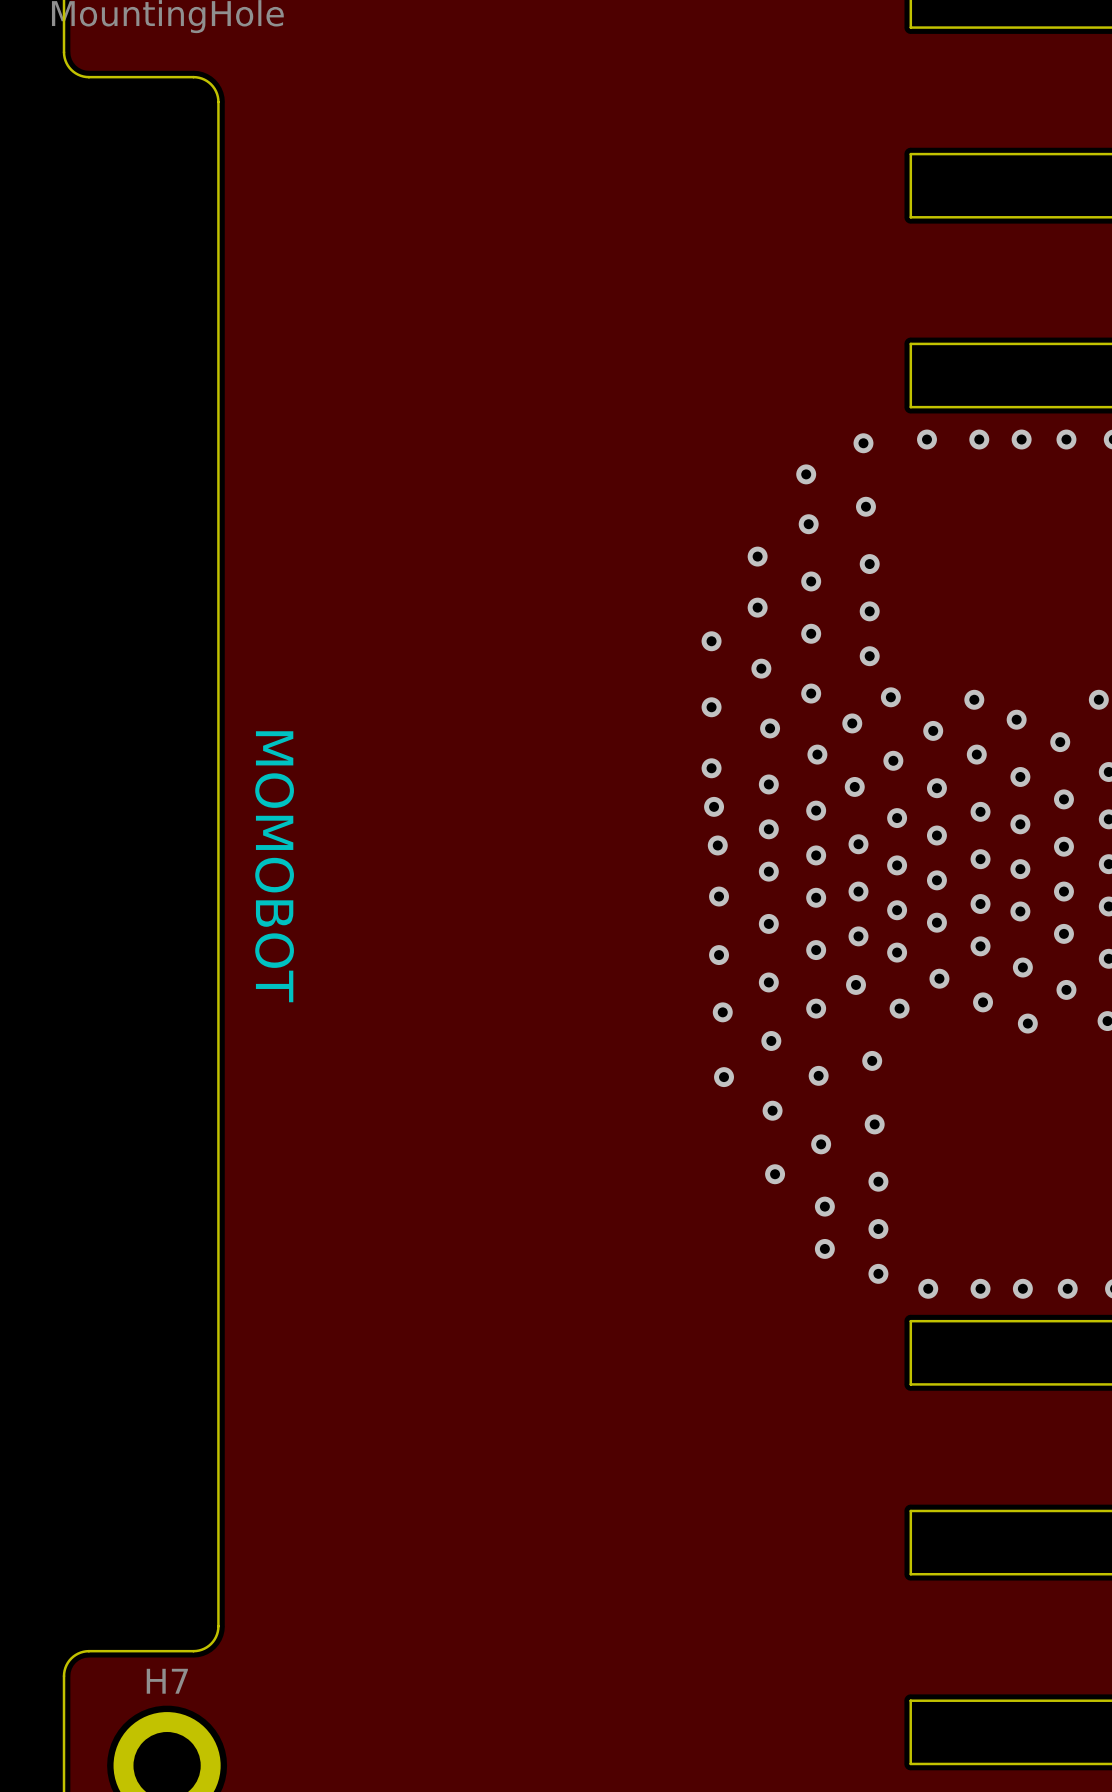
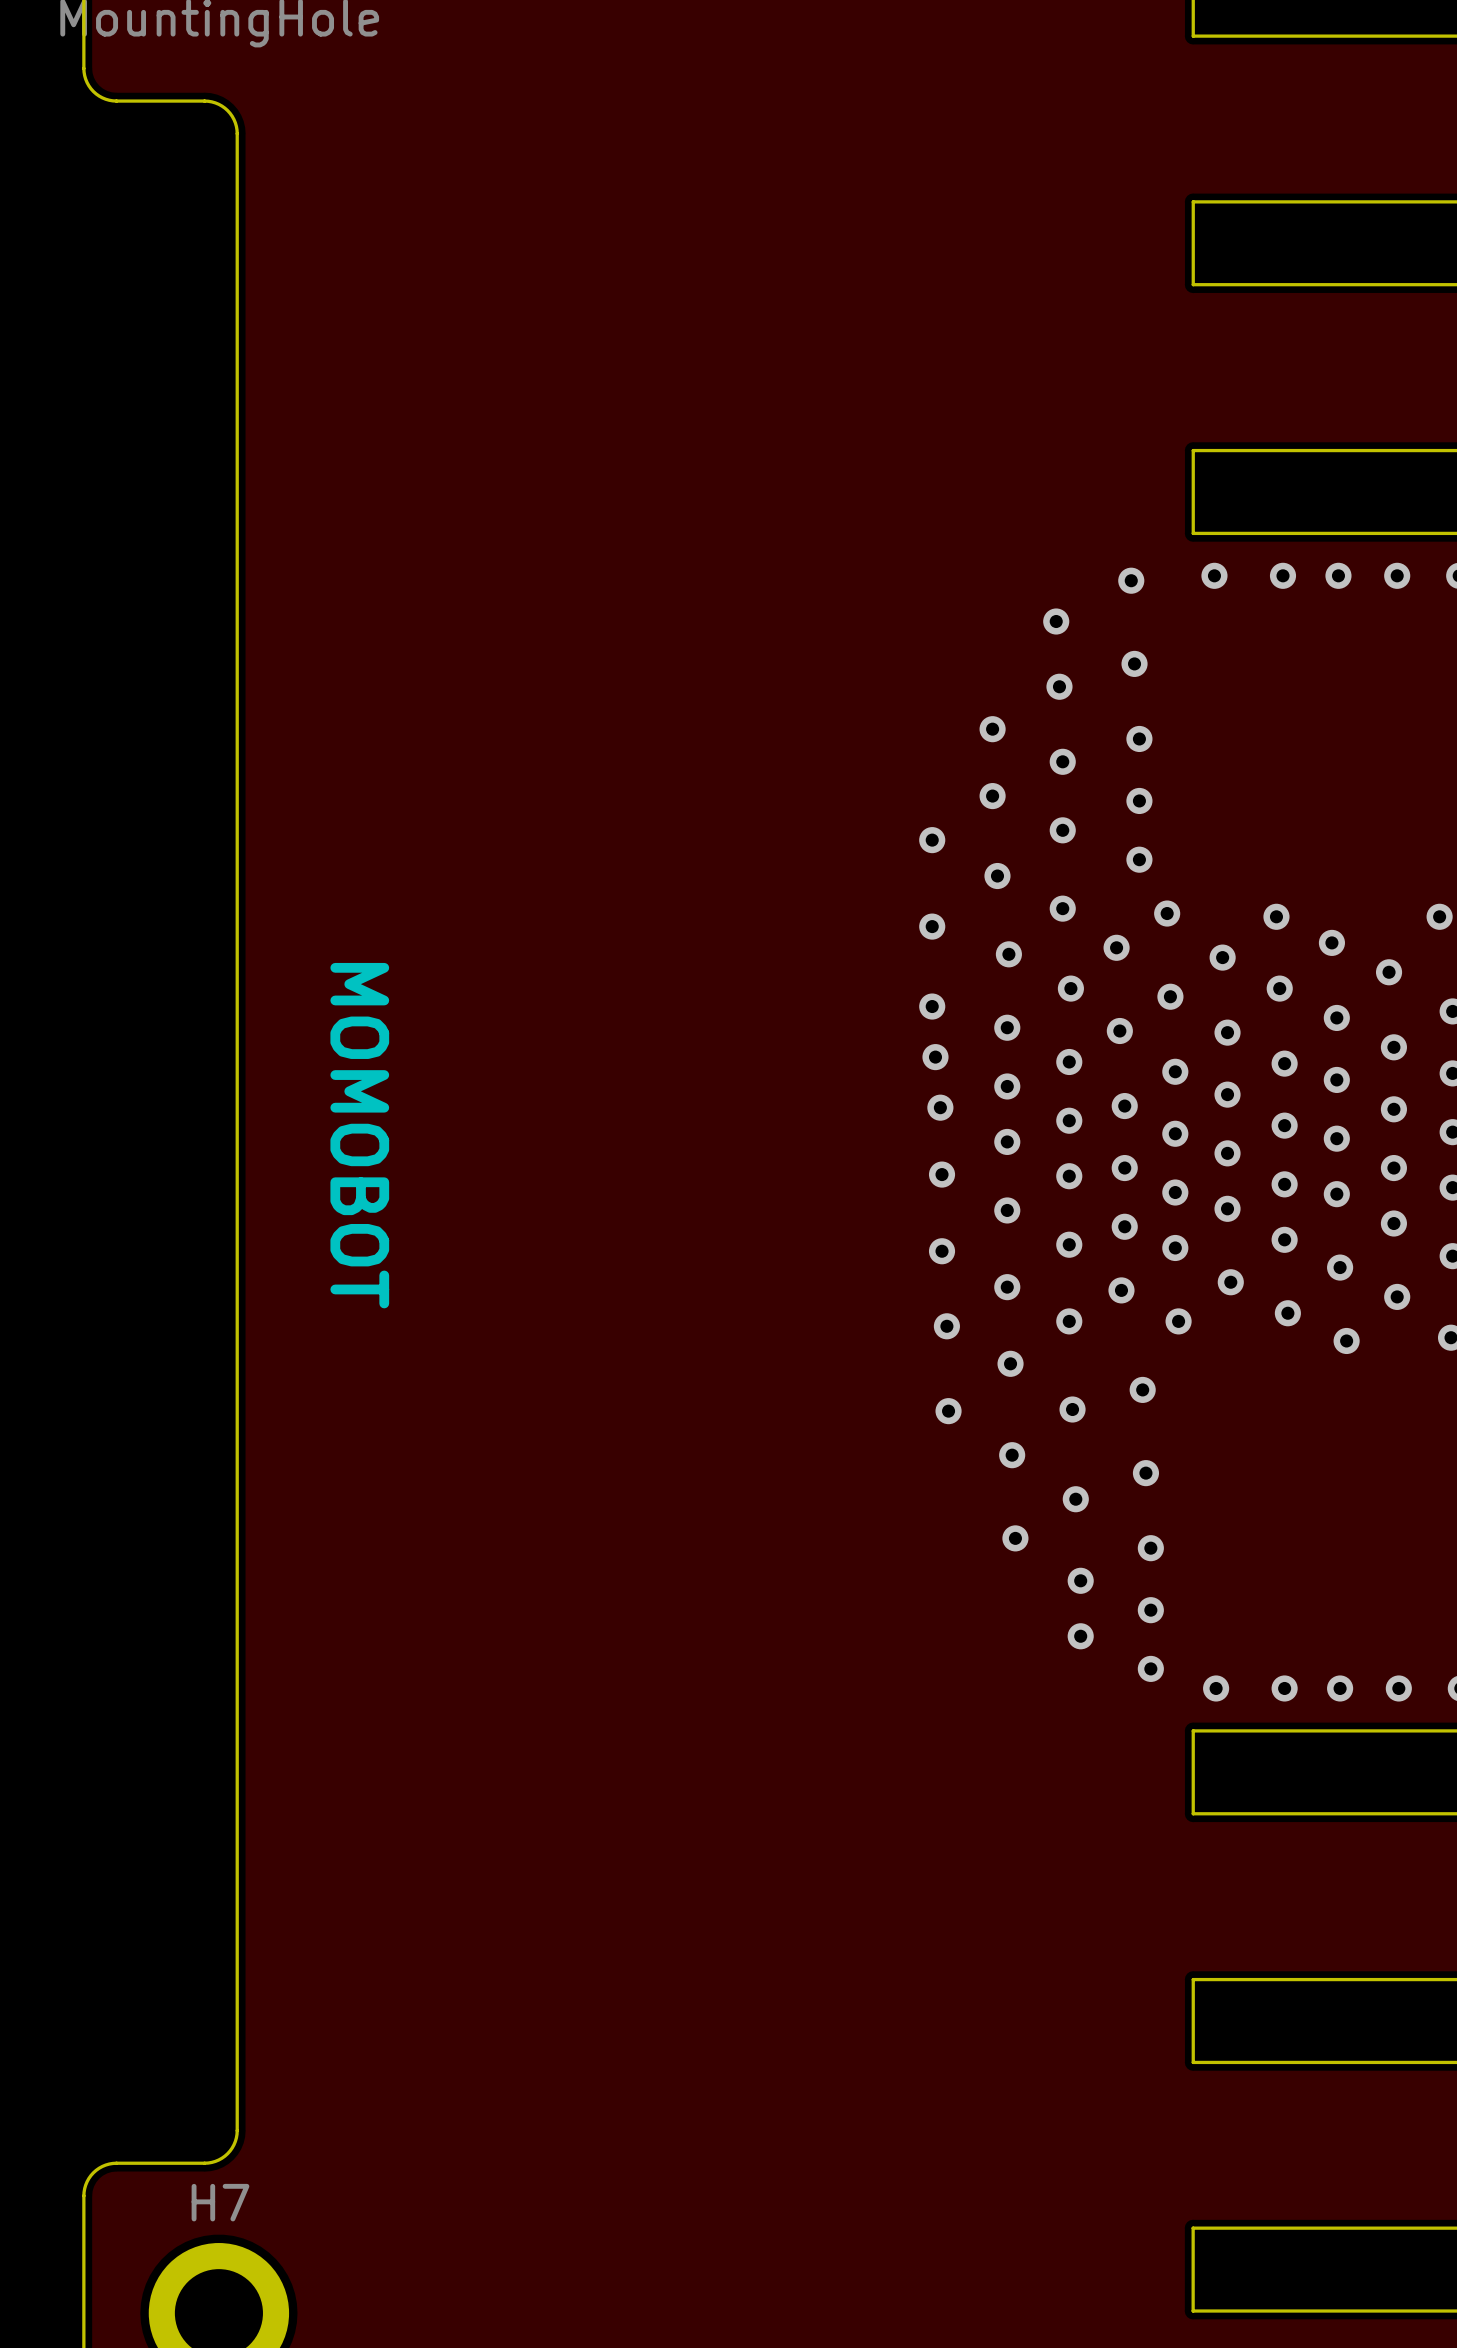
board edge: (156, 77) (201, 78) (214, 88) (218, 102) (218, 1626) (214, 1639) (201, 1649) (156, 1651) -> (204, 101) (218, 104) (227, 110) (235, 122) (237, 133) (237, 2130) (233, 2144) (227, 2153) (215, 2161) (204, 2163)

